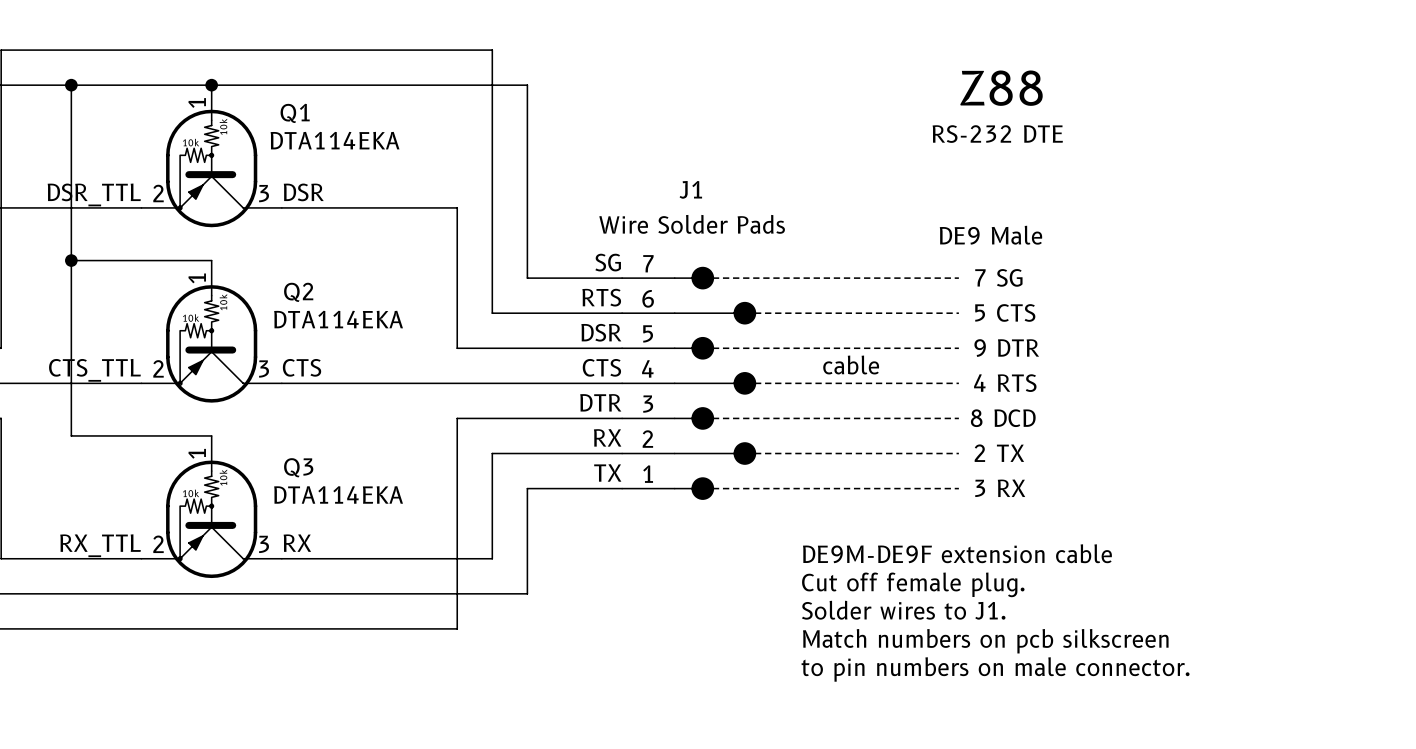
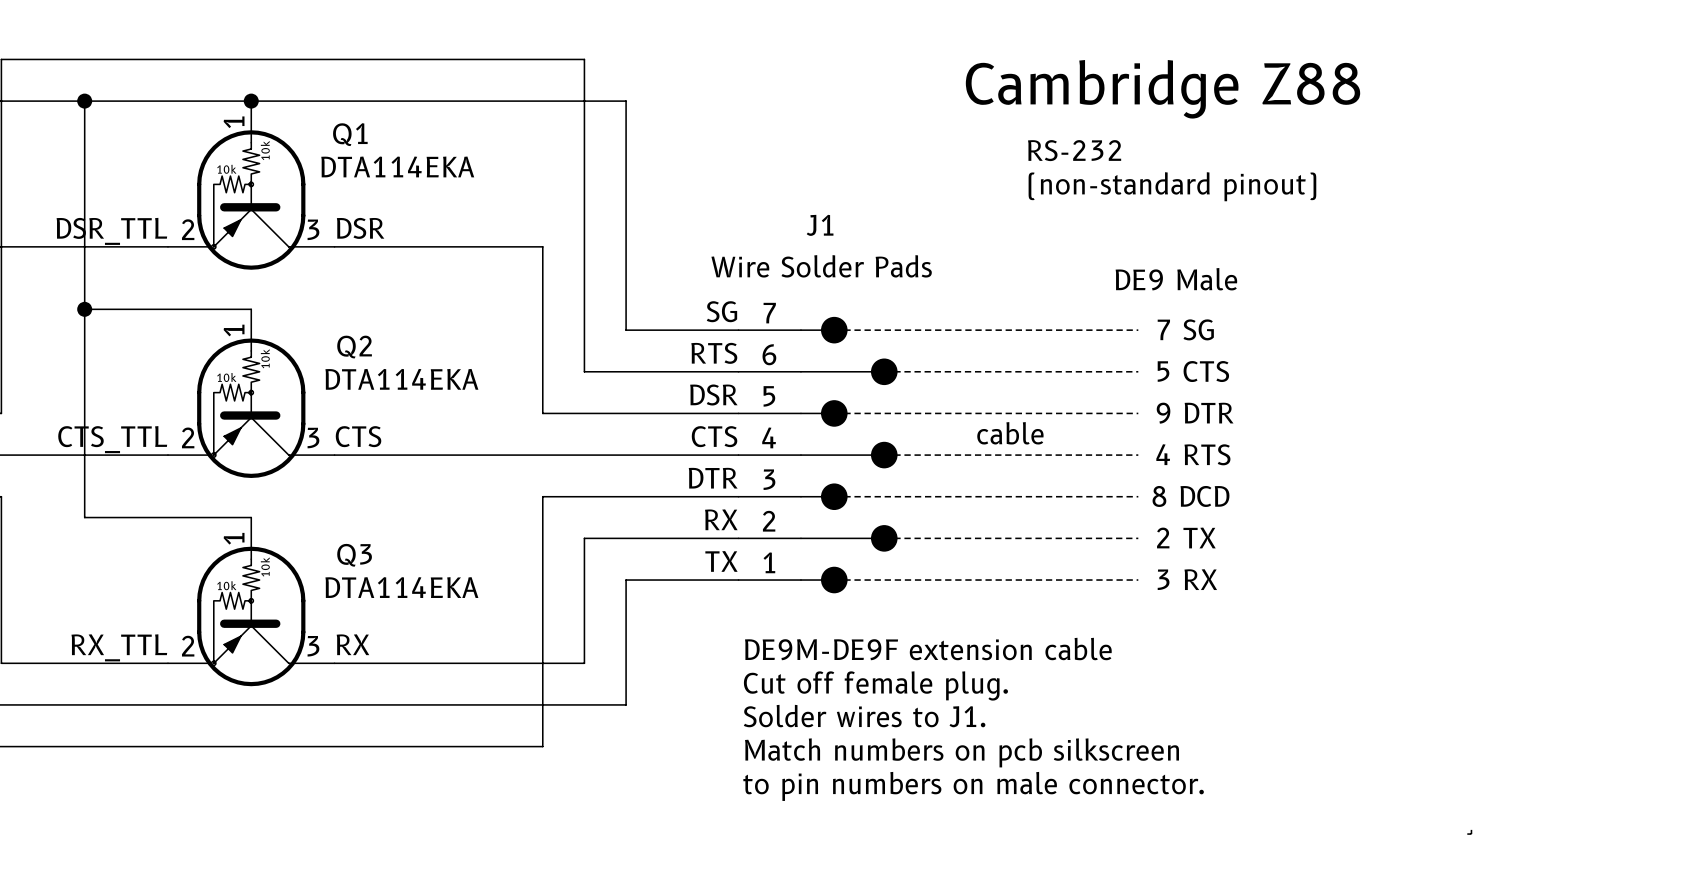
text: none -> Cambridge Z88 (1163, 89)
text: Z88 (1001, 88) -> none
text: RS-232 DTE (997, 134) -> RS-232 (1074, 150)
text: none -> (non-standard pinout) (1172, 186)
text position: DE9M-DE9F extension cable (957, 553) -> DE9M-DE9F extension cable (928, 649)
text position: Cut off female plug. (913, 584) -> Cut off female plug. (875, 685)
text position: Solder wires to J1. (903, 610) -> Solder wires to J1. (864, 716)
text position: Match numbers on pcb silkscreen (985, 641) -> Match numbers on pcb silkscreen (962, 752)
text position: to pin numbers on male connector. (995, 669) -> to pin numbers on male connector. (973, 786)
line: none -> (1471, 829) (1471, 834) (1467, 834)

